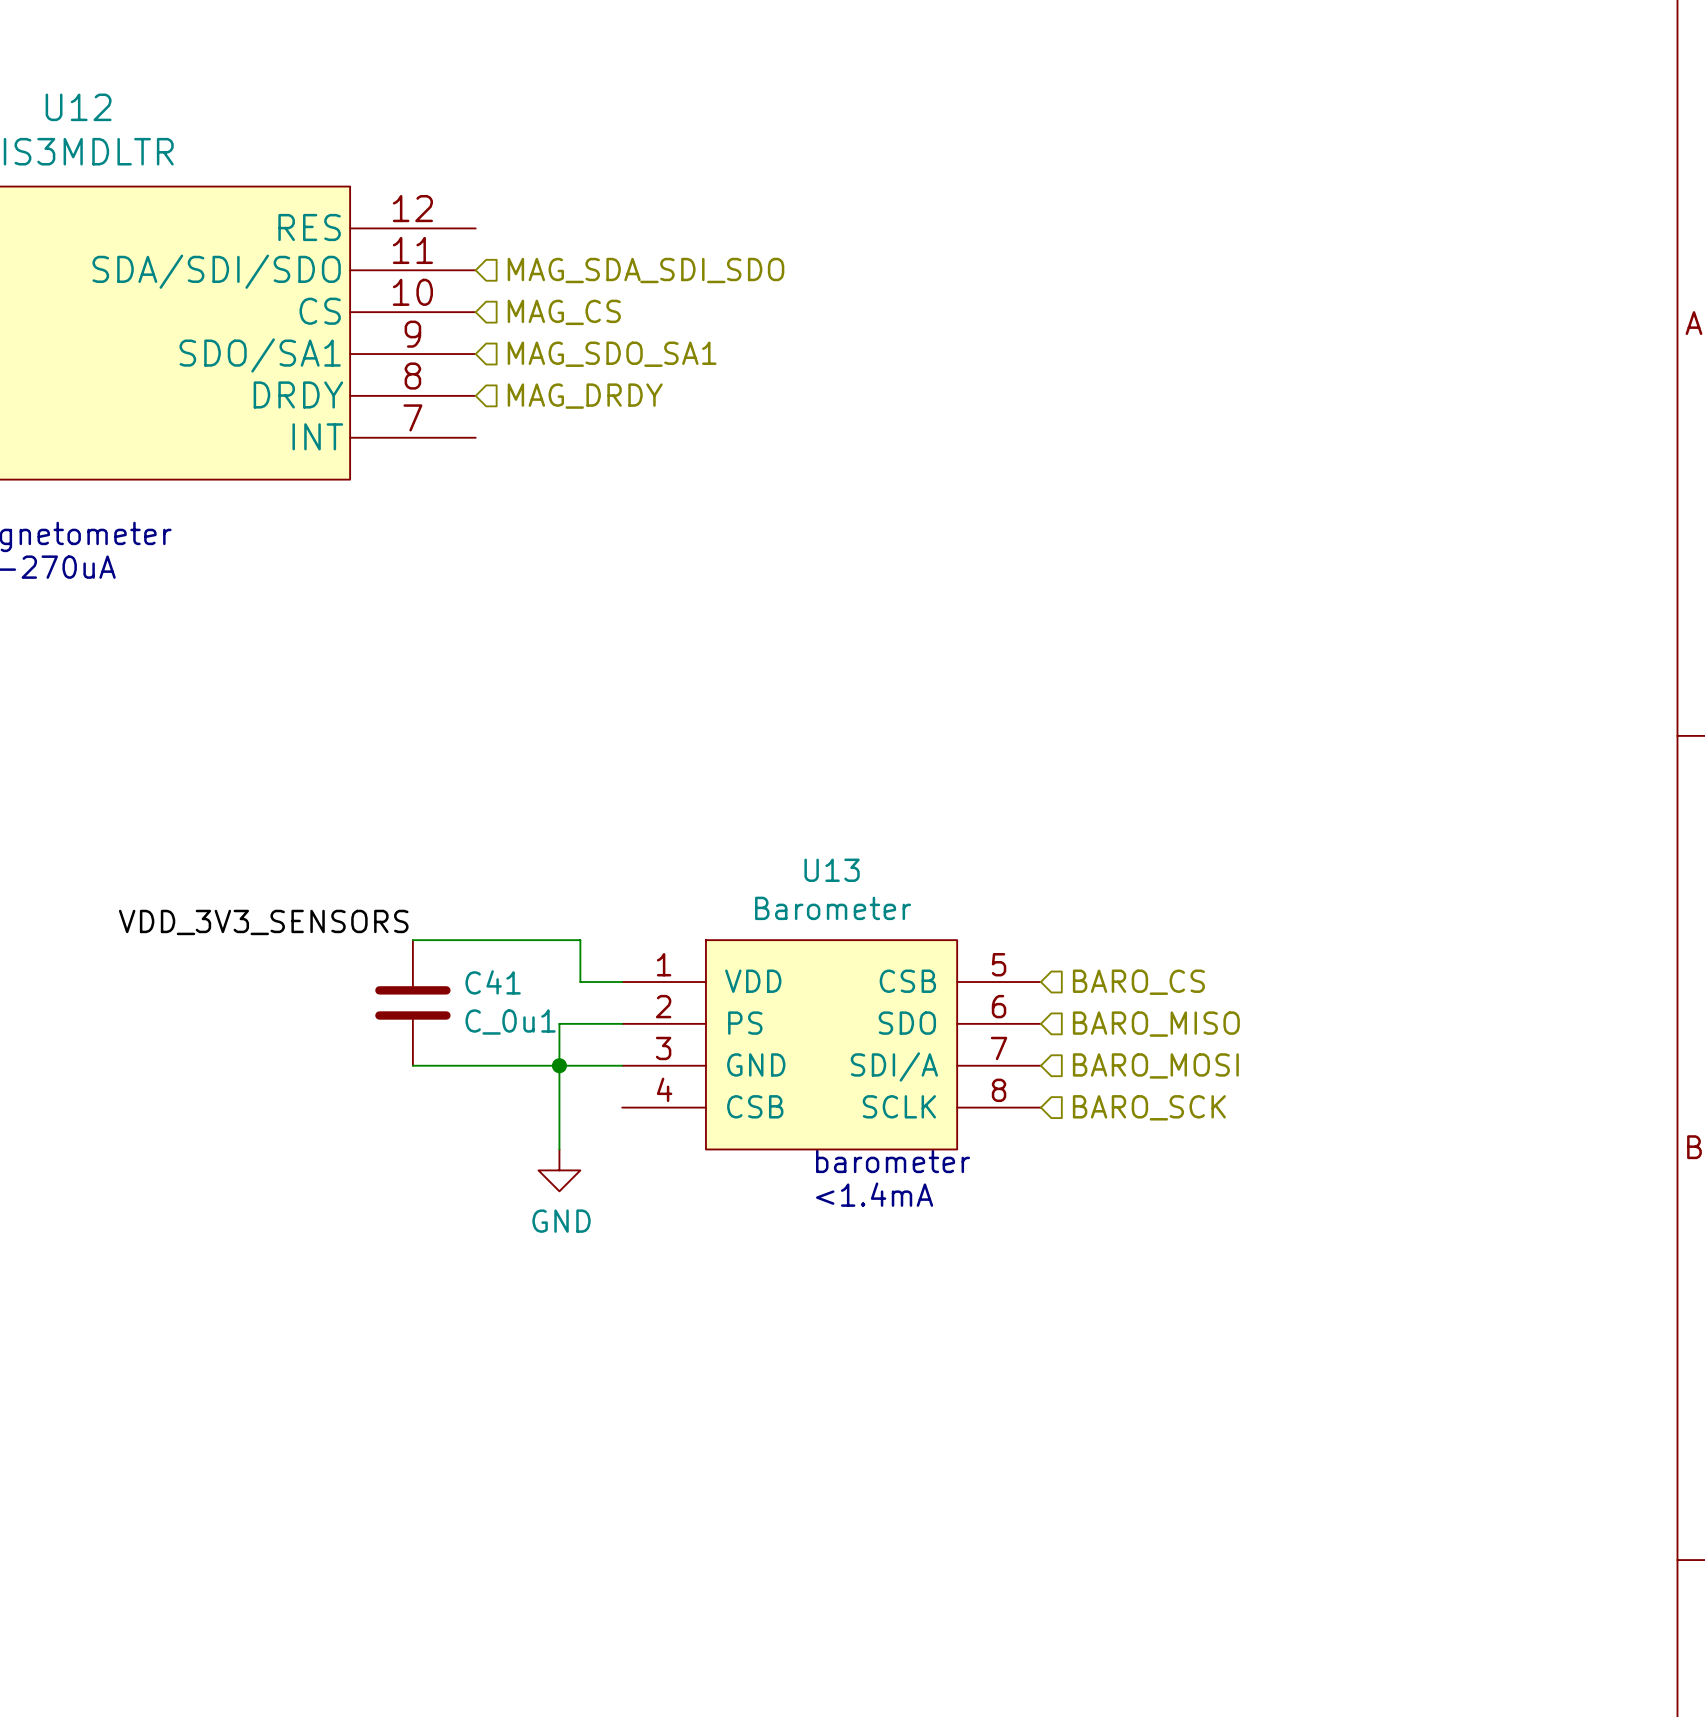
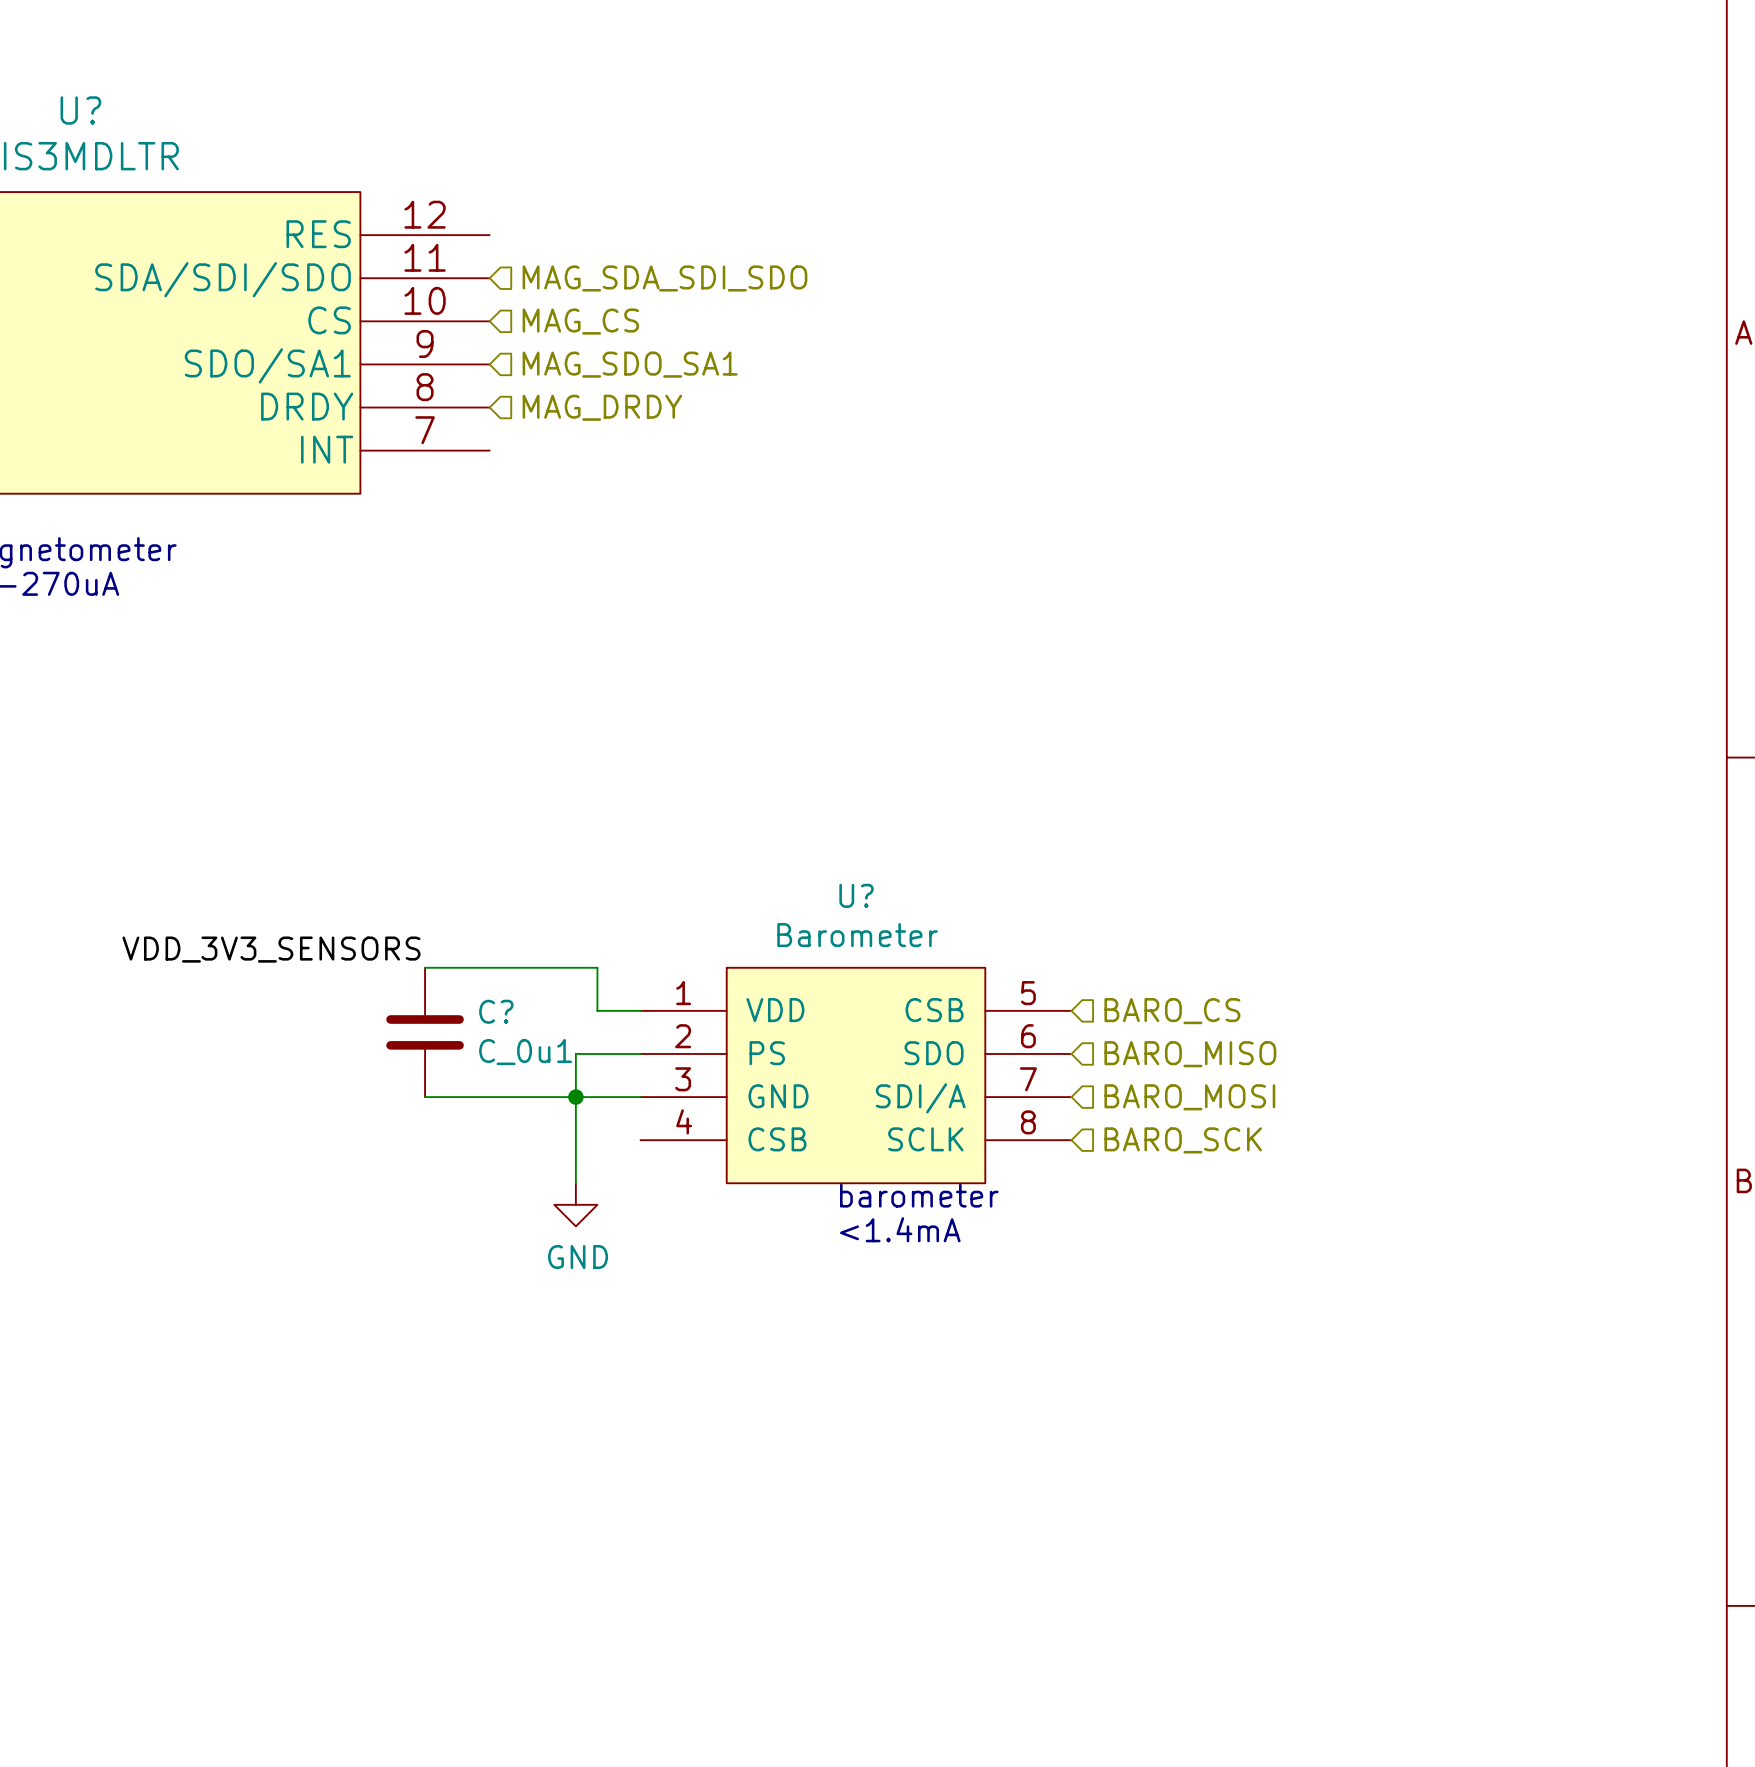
U12 name: U12 (78, 107) -> U? (80, 110)
U13 name: U13 (832, 870) -> U? (856, 895)
C41 name: C41 (493, 982) -> C? (496, 1011)

